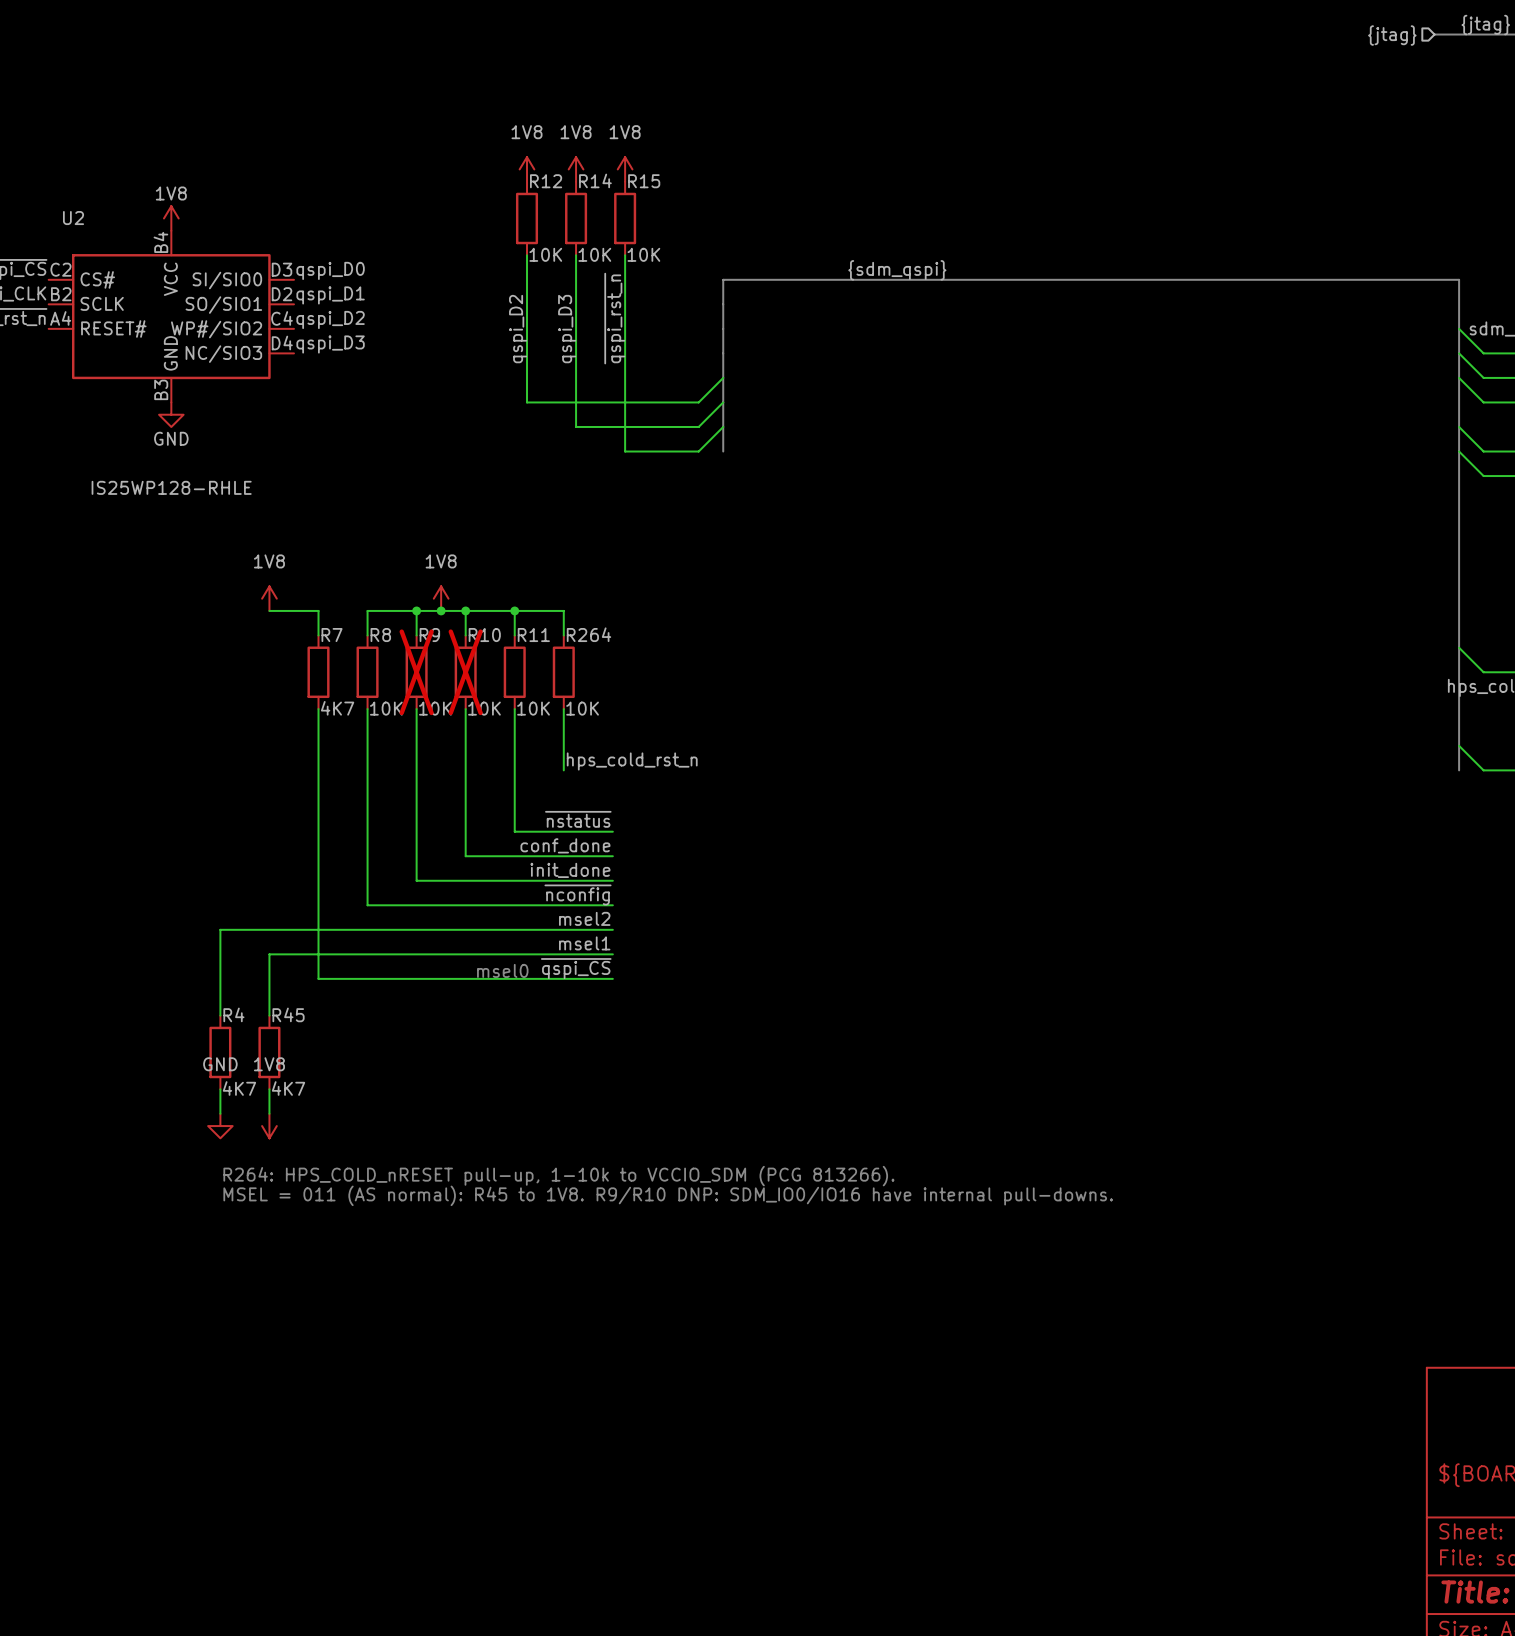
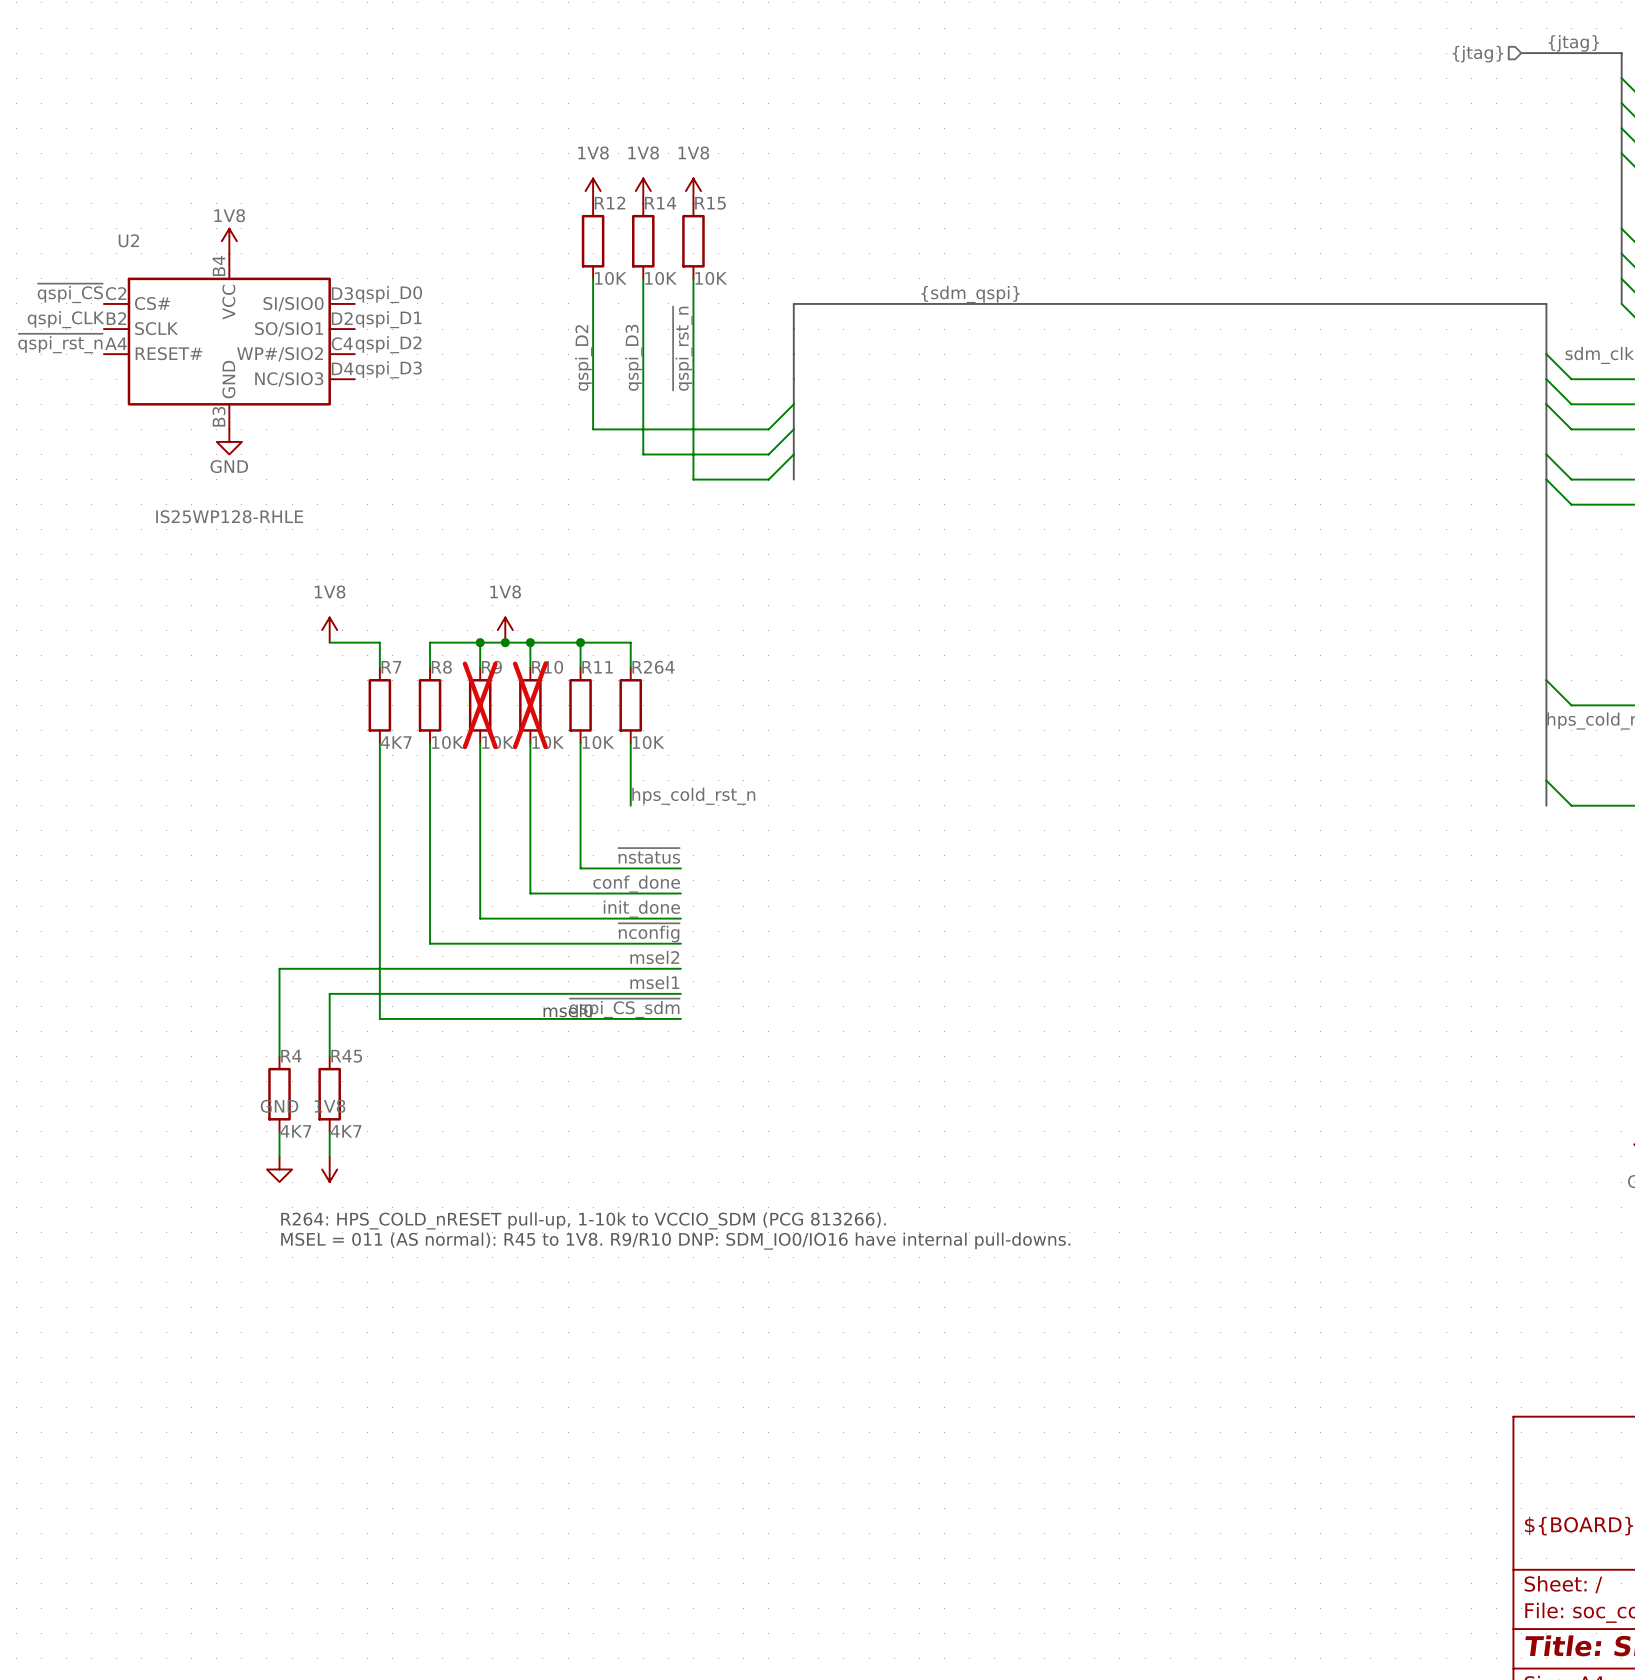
label: ~{qspi_CS} (576, 968) -> ~{qspi_CS_sdm} (624, 1008)

